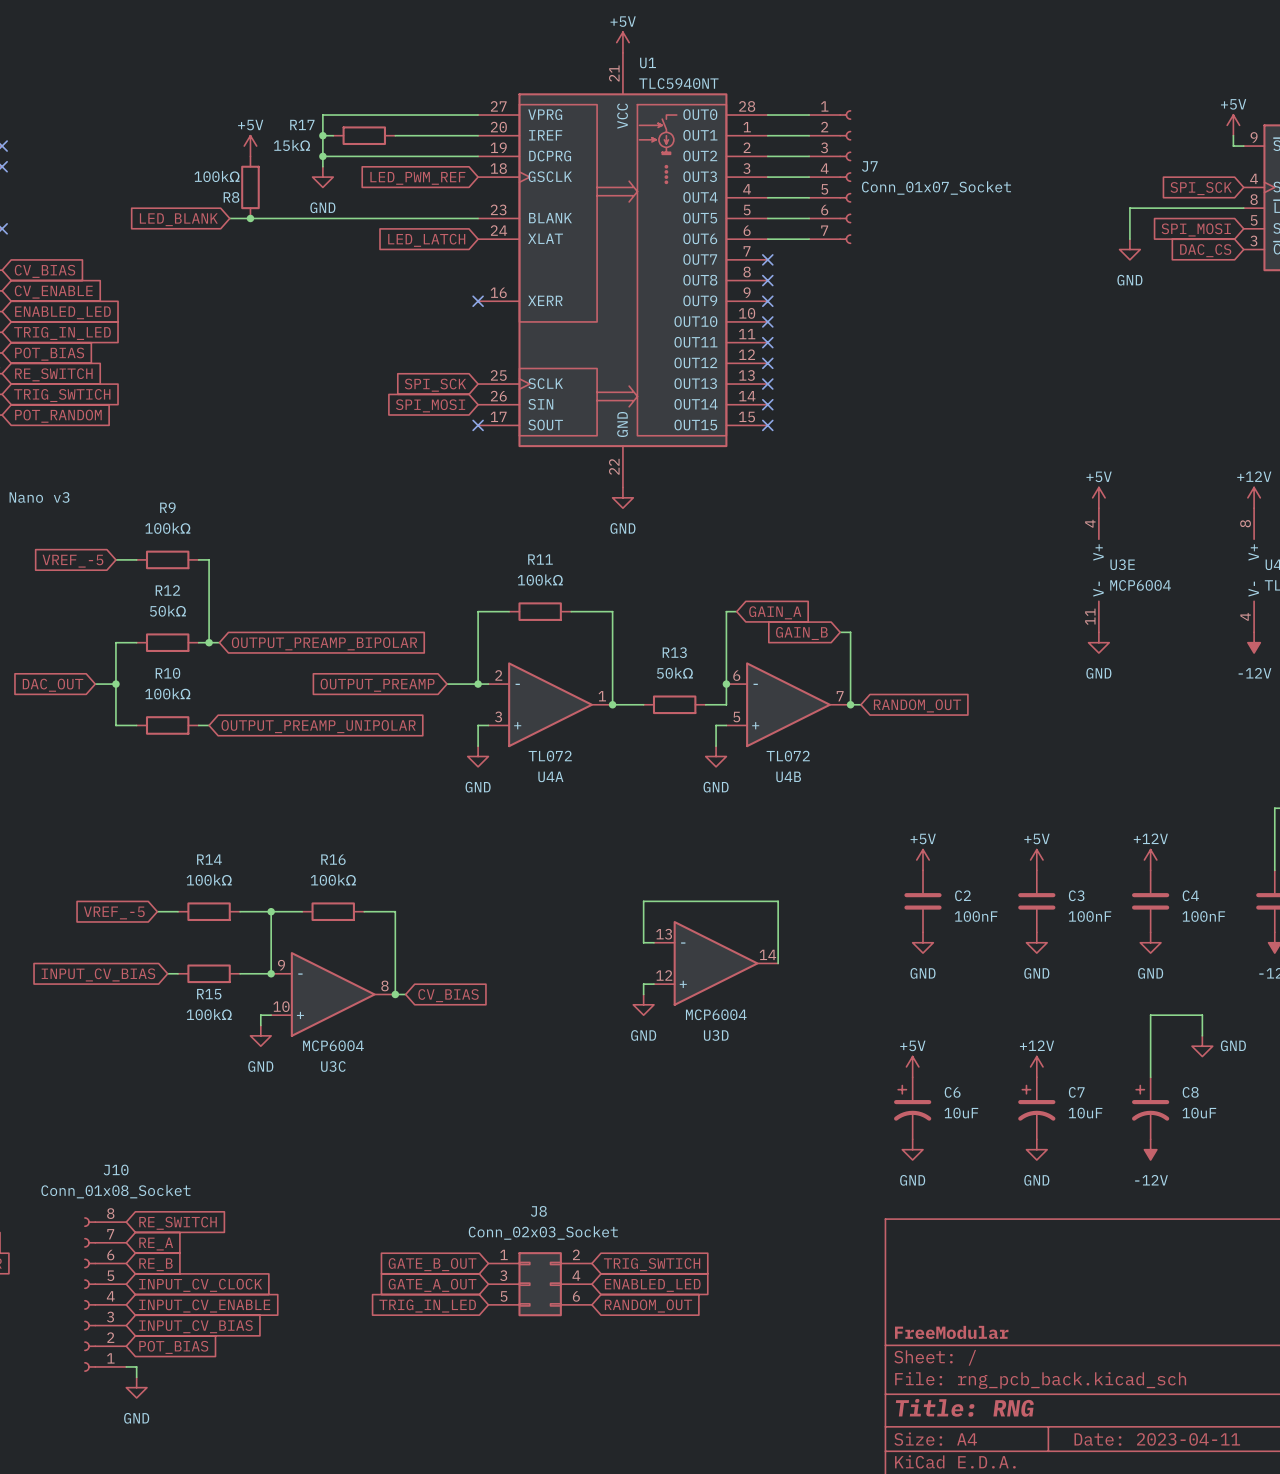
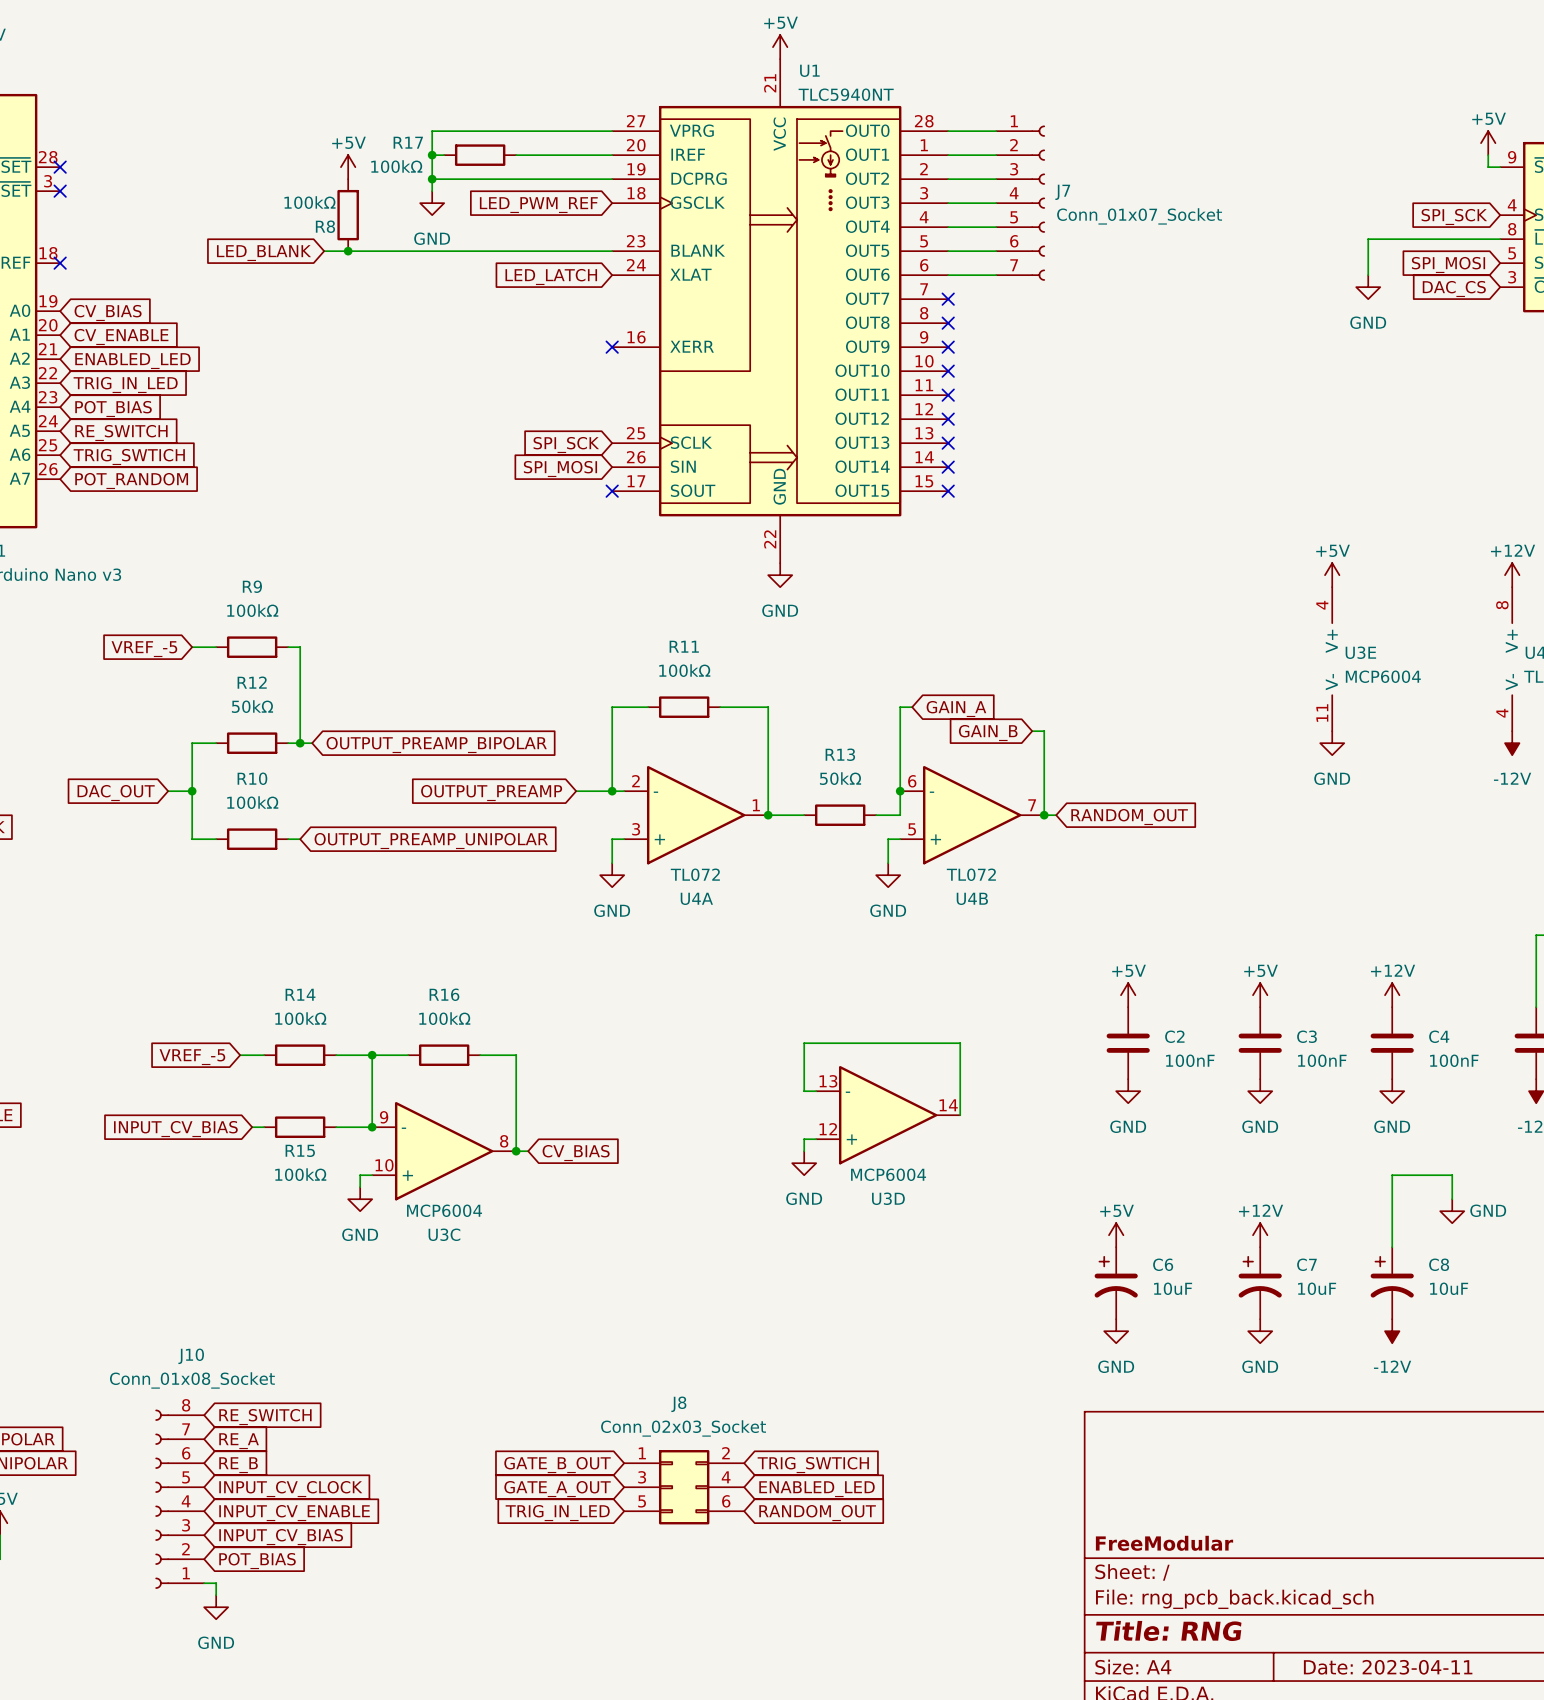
R17 value: 15kΩ (291, 145) -> 100kΩ (396, 166)

